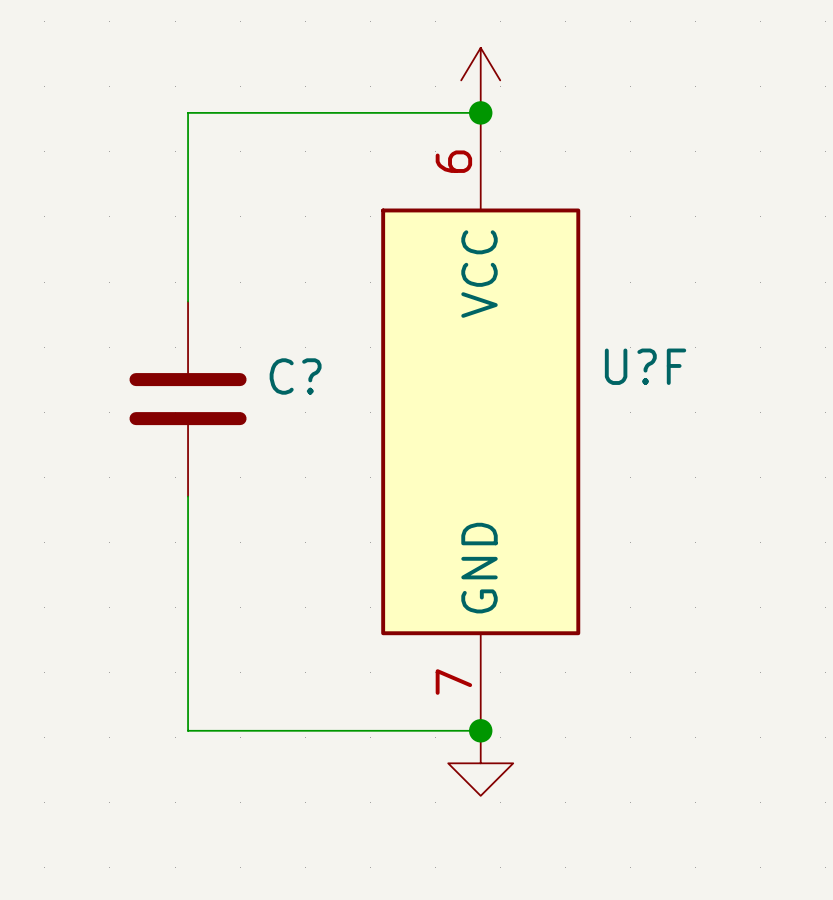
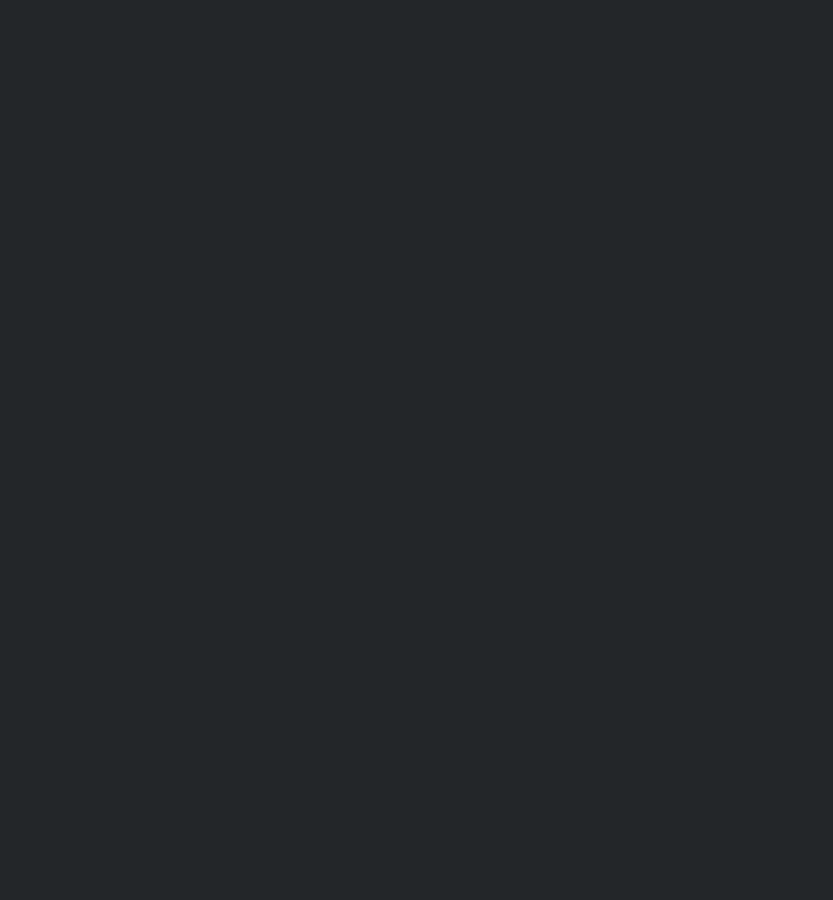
power symbol: (480, 80) -> none
wire: (480, 112) (188, 112) (188, 301) -> none
junction: (480, 112) -> none
C?: (188, 399) -> none
U?F: (480, 421) -> none
wire: (188, 496) (188, 730) (480, 730) -> none
junction: (480, 730) -> none
power symbol: (480, 763) -> none

